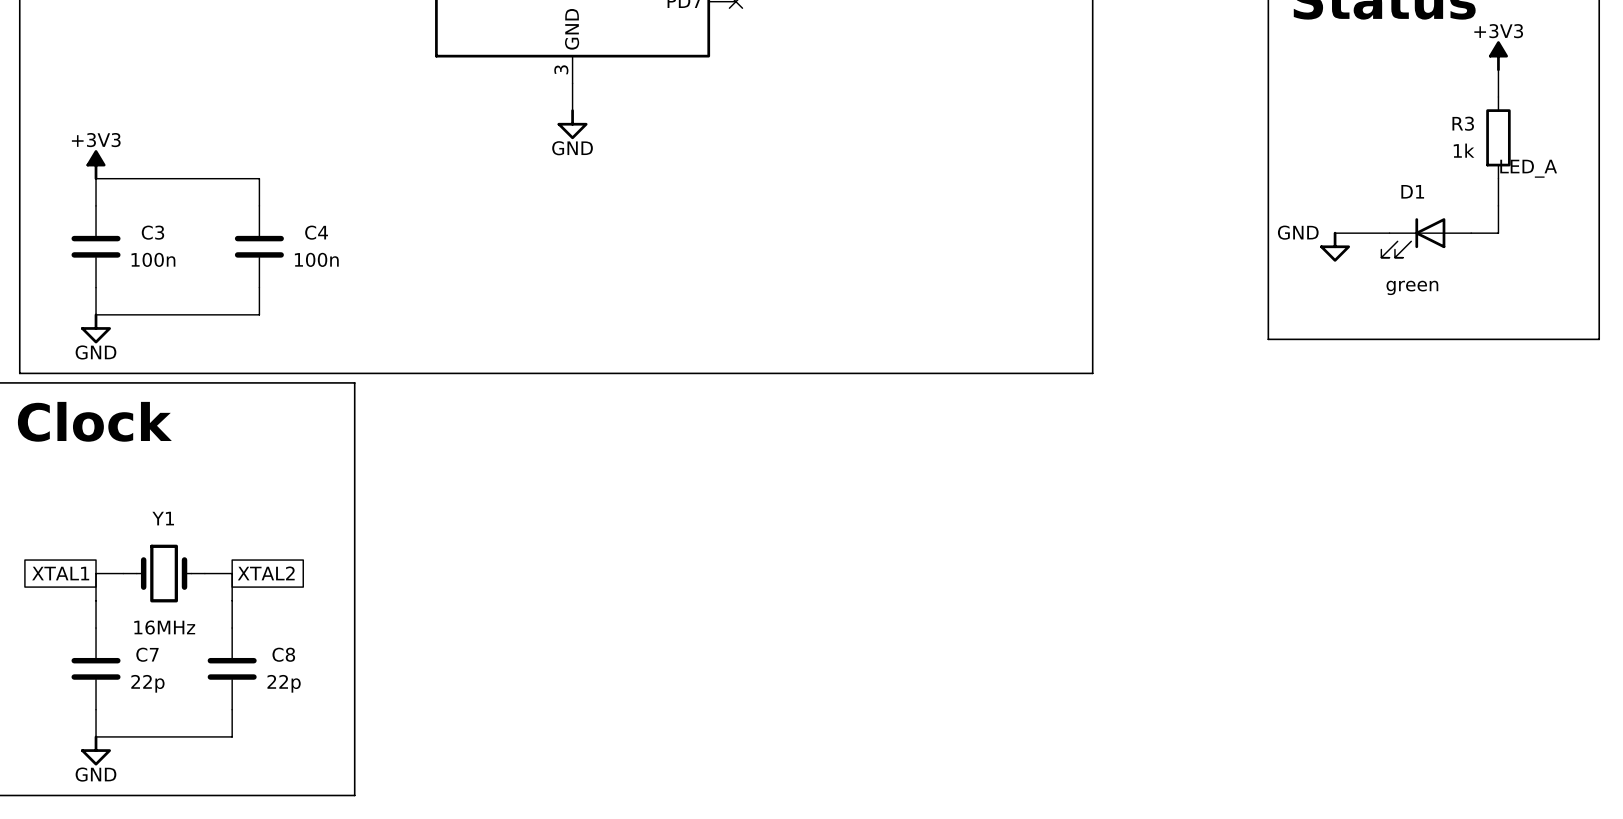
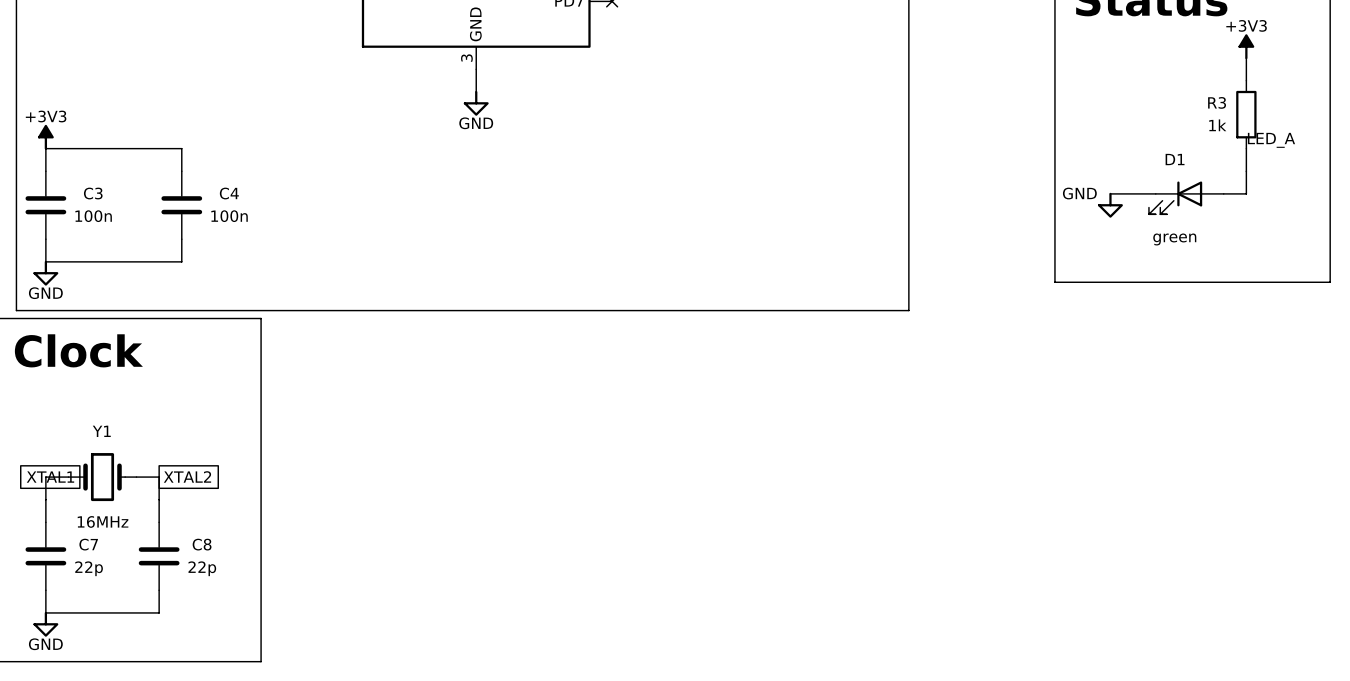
power symbol position: +3V3 (96, 165) -> +3V3 (45, 137)
wire: (96, 178) (96, 205) -> (79, 148) (45, 148) (45, 171)
wire: (218, 178) (259, 178) (259, 205) -> (181, 148) (181, 171)
C3 position: (96, 246) -> (45, 205)
C4 position: (259, 246) -> (181, 205)
wire: (96, 287) (96, 314) -> (45, 239) (45, 261) (79, 261)
wire: (259, 287) (259, 314) (218, 314) -> (181, 239) (181, 261)
power symbol position: GND (96, 328) -> GND (45, 273)
line: (313, 382) (354, 382) (354, 795) (313, 795) -> (261, 318) (261, 661)
wire: (123, 573) (96, 573) (96, 628) -> (68, 477) (45, 477) (45, 522)
Y1 position: (164, 573) -> (102, 477)
wire: (204, 573) (232, 573) (232, 628) -> (136, 477) (159, 477) (159, 522)
global label position: XTAL2 (266, 573) -> XTAL2 (187, 476)
C7 position: (96, 668) -> (45, 556)
C8 position: (232, 668) -> (159, 556)
wire: (96, 709) (96, 736) -> (45, 590) (45, 612) (79, 612)
wire: (232, 709) (232, 736) (191, 736) -> (159, 590) (159, 612)
power symbol position: GND (96, 750) -> GND (45, 624)

